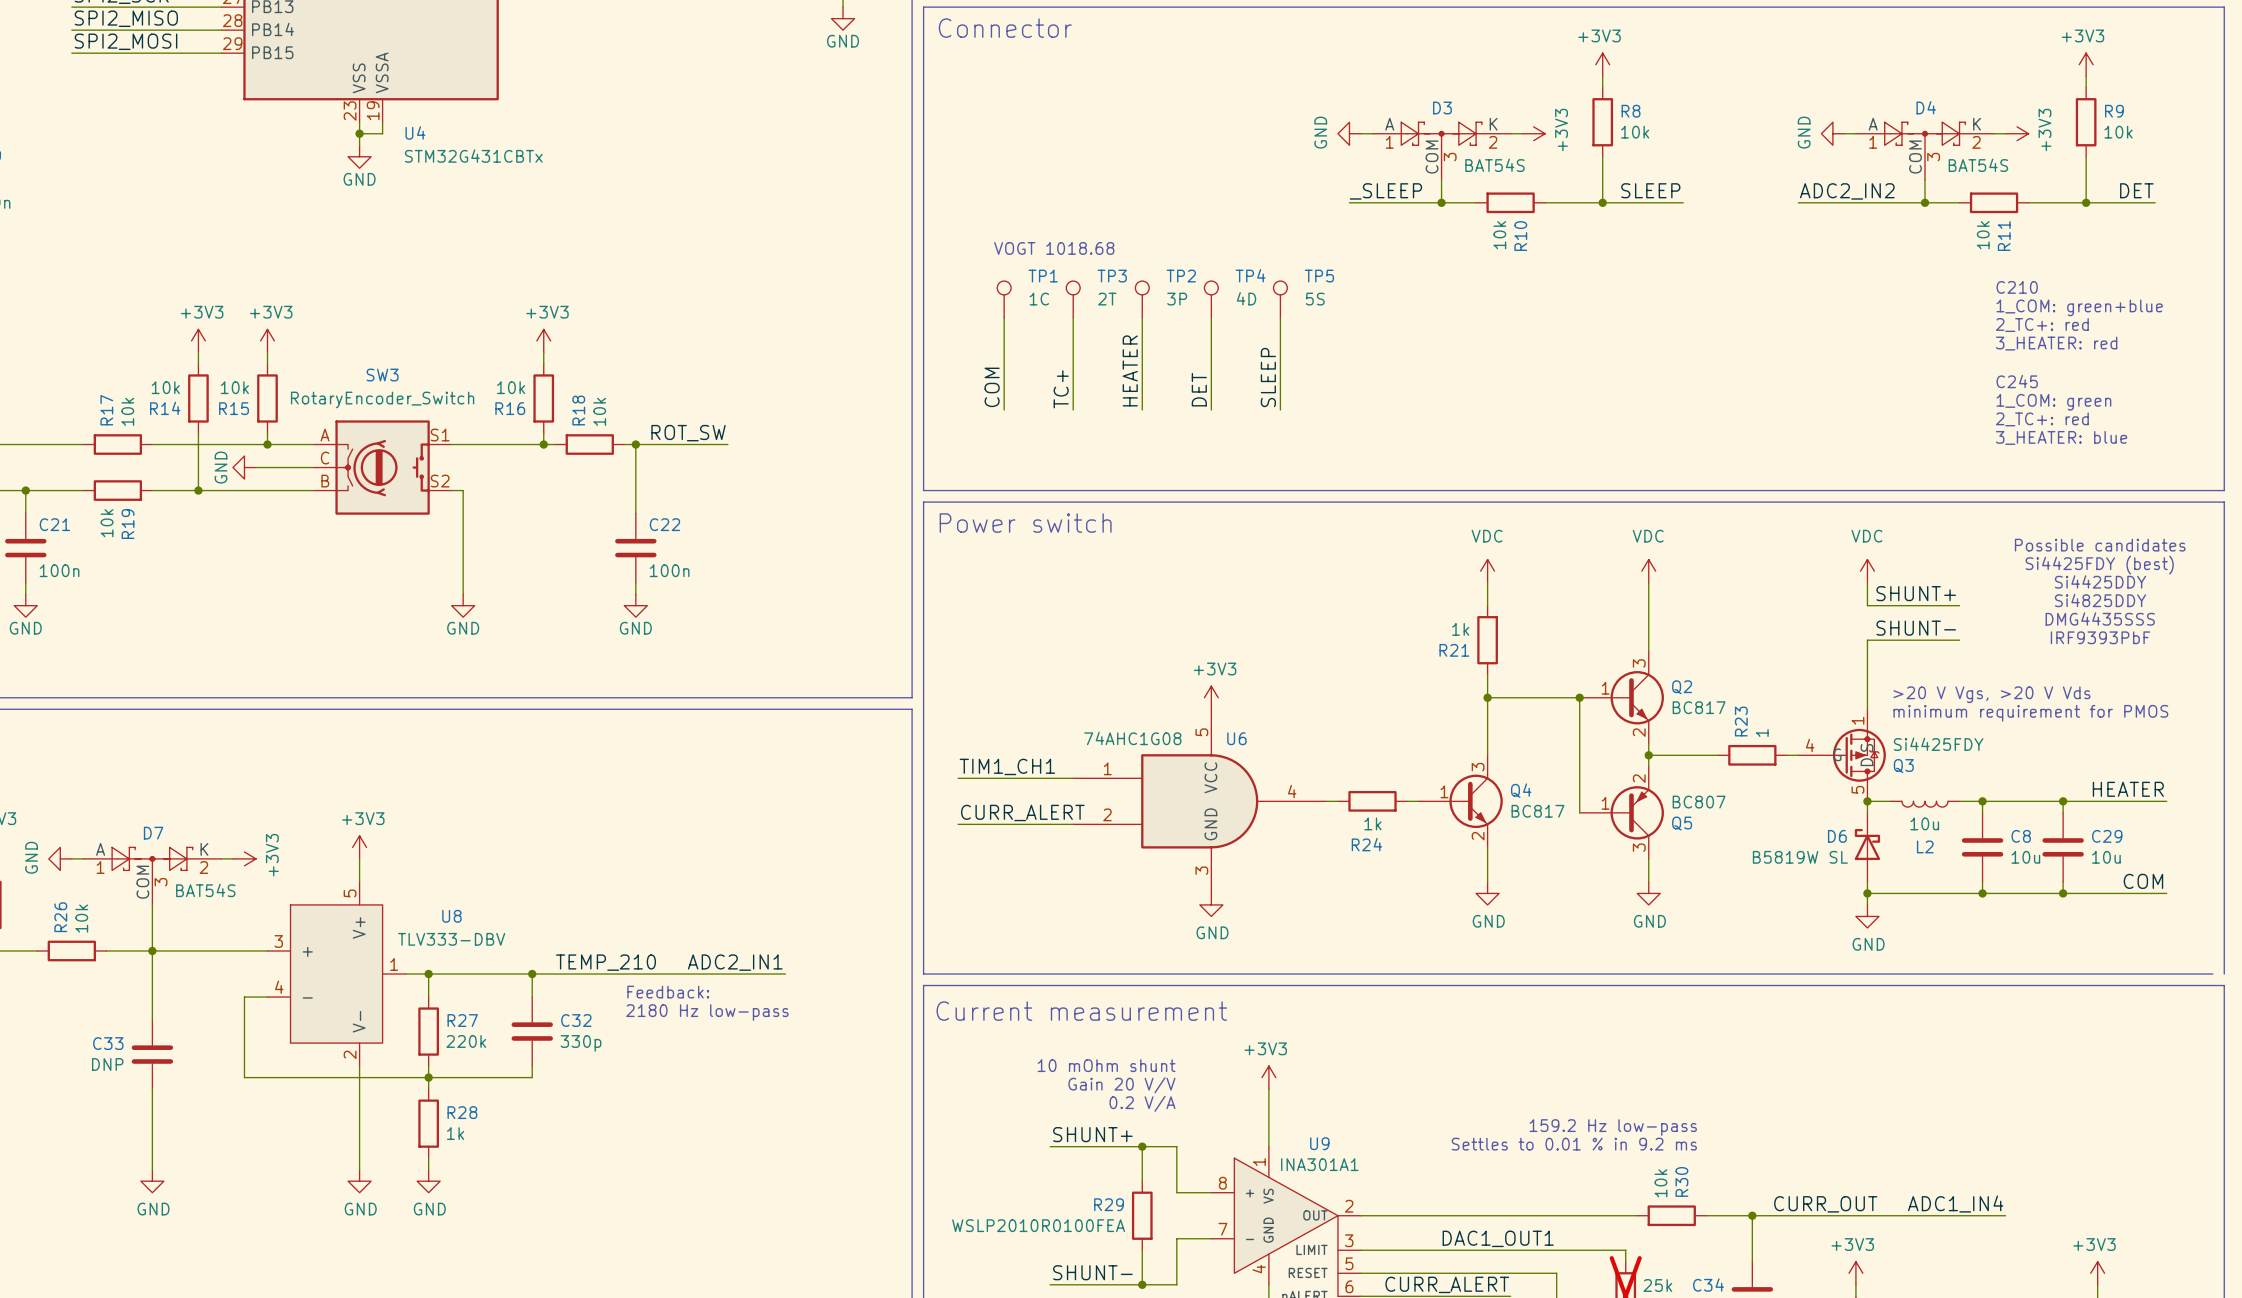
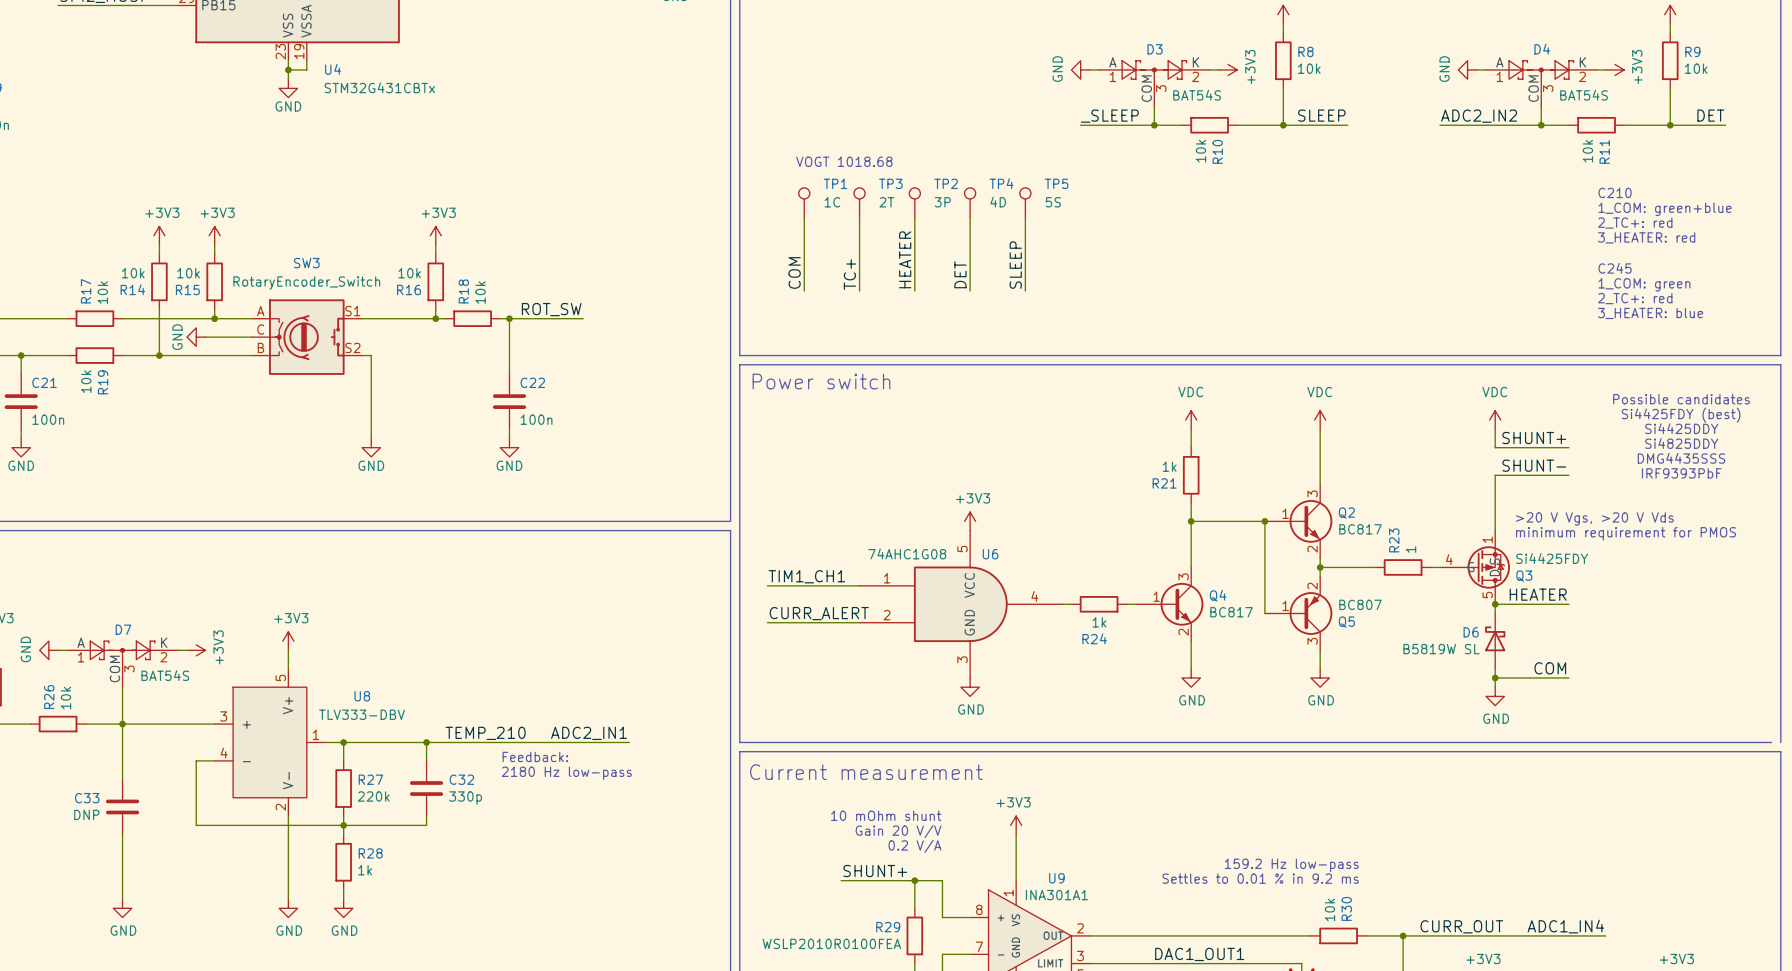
label position: HEATER (2128, 789) -> HEATER (1538, 594)
wire: (1959, 801) (2166, 801) -> (1568, 604) (1513, 604)
wire: (1982, 801) (1982, 812) -> none
junction: (1982, 801) -> none
wire: (2063, 801) (2063, 812) -> none
junction: (2063, 801) -> none
L2: 10u (1925, 804) -> none
C8: 10u (1982, 847) -> none
C29: 10u (2063, 847) -> none
wire: (1982, 881) (1982, 893) -> none
wire: (2063, 881) (2063, 893) -> none
label position: COM (2143, 881) -> COM (1550, 668)
wire: (1959, 893) (2166, 893) -> none
junction: (1982, 893) -> none
junction: (2063, 893) -> none

